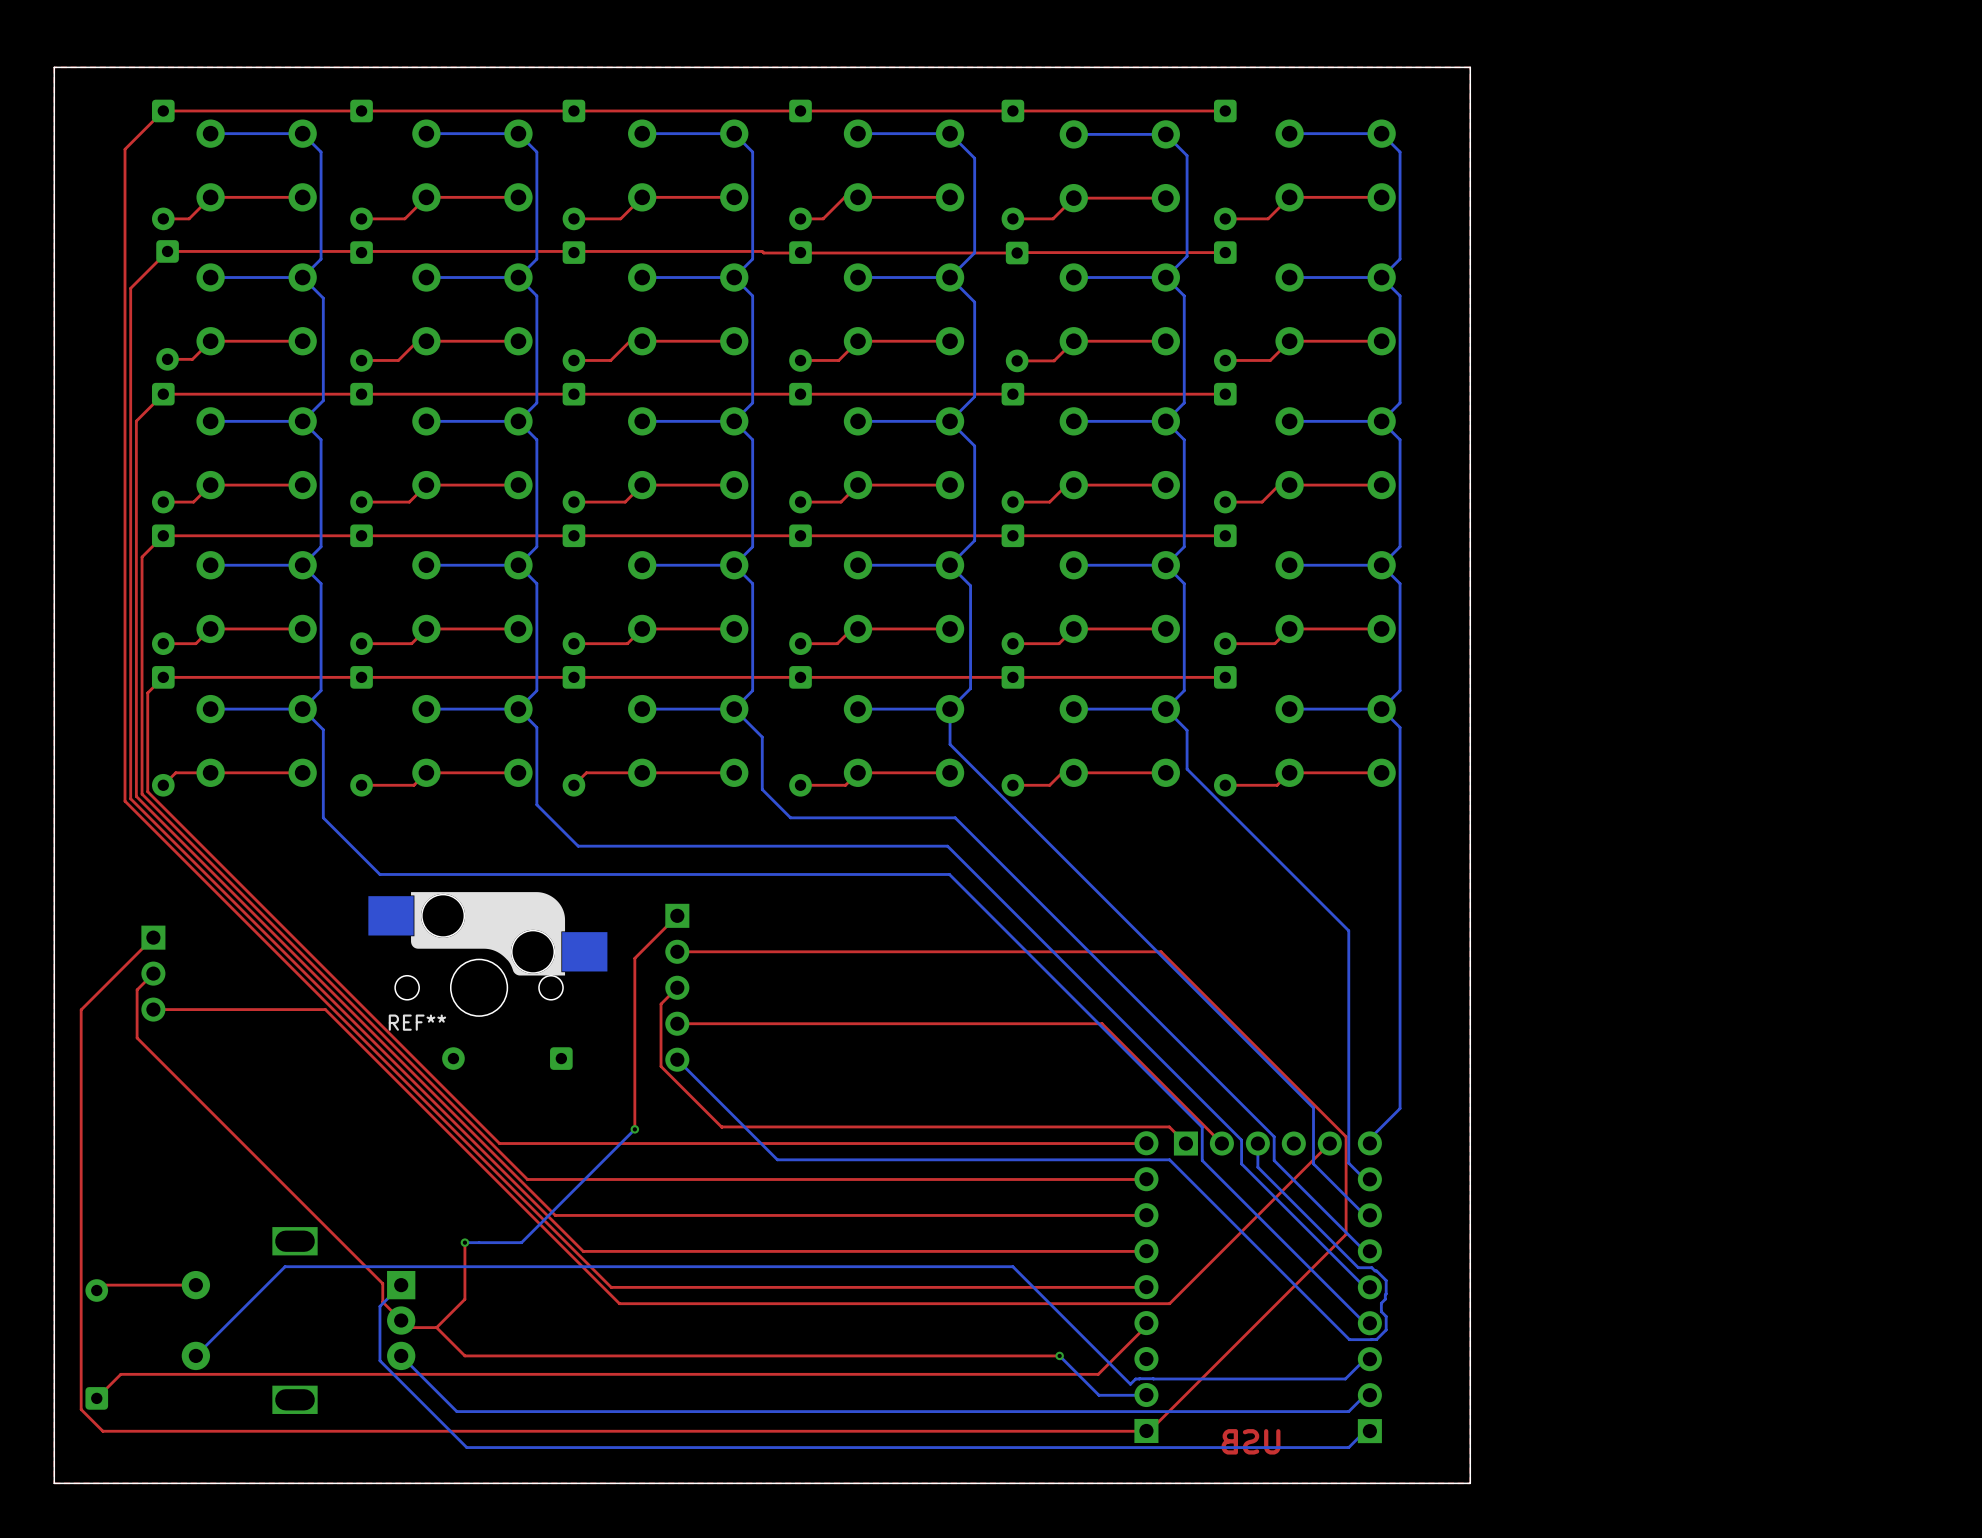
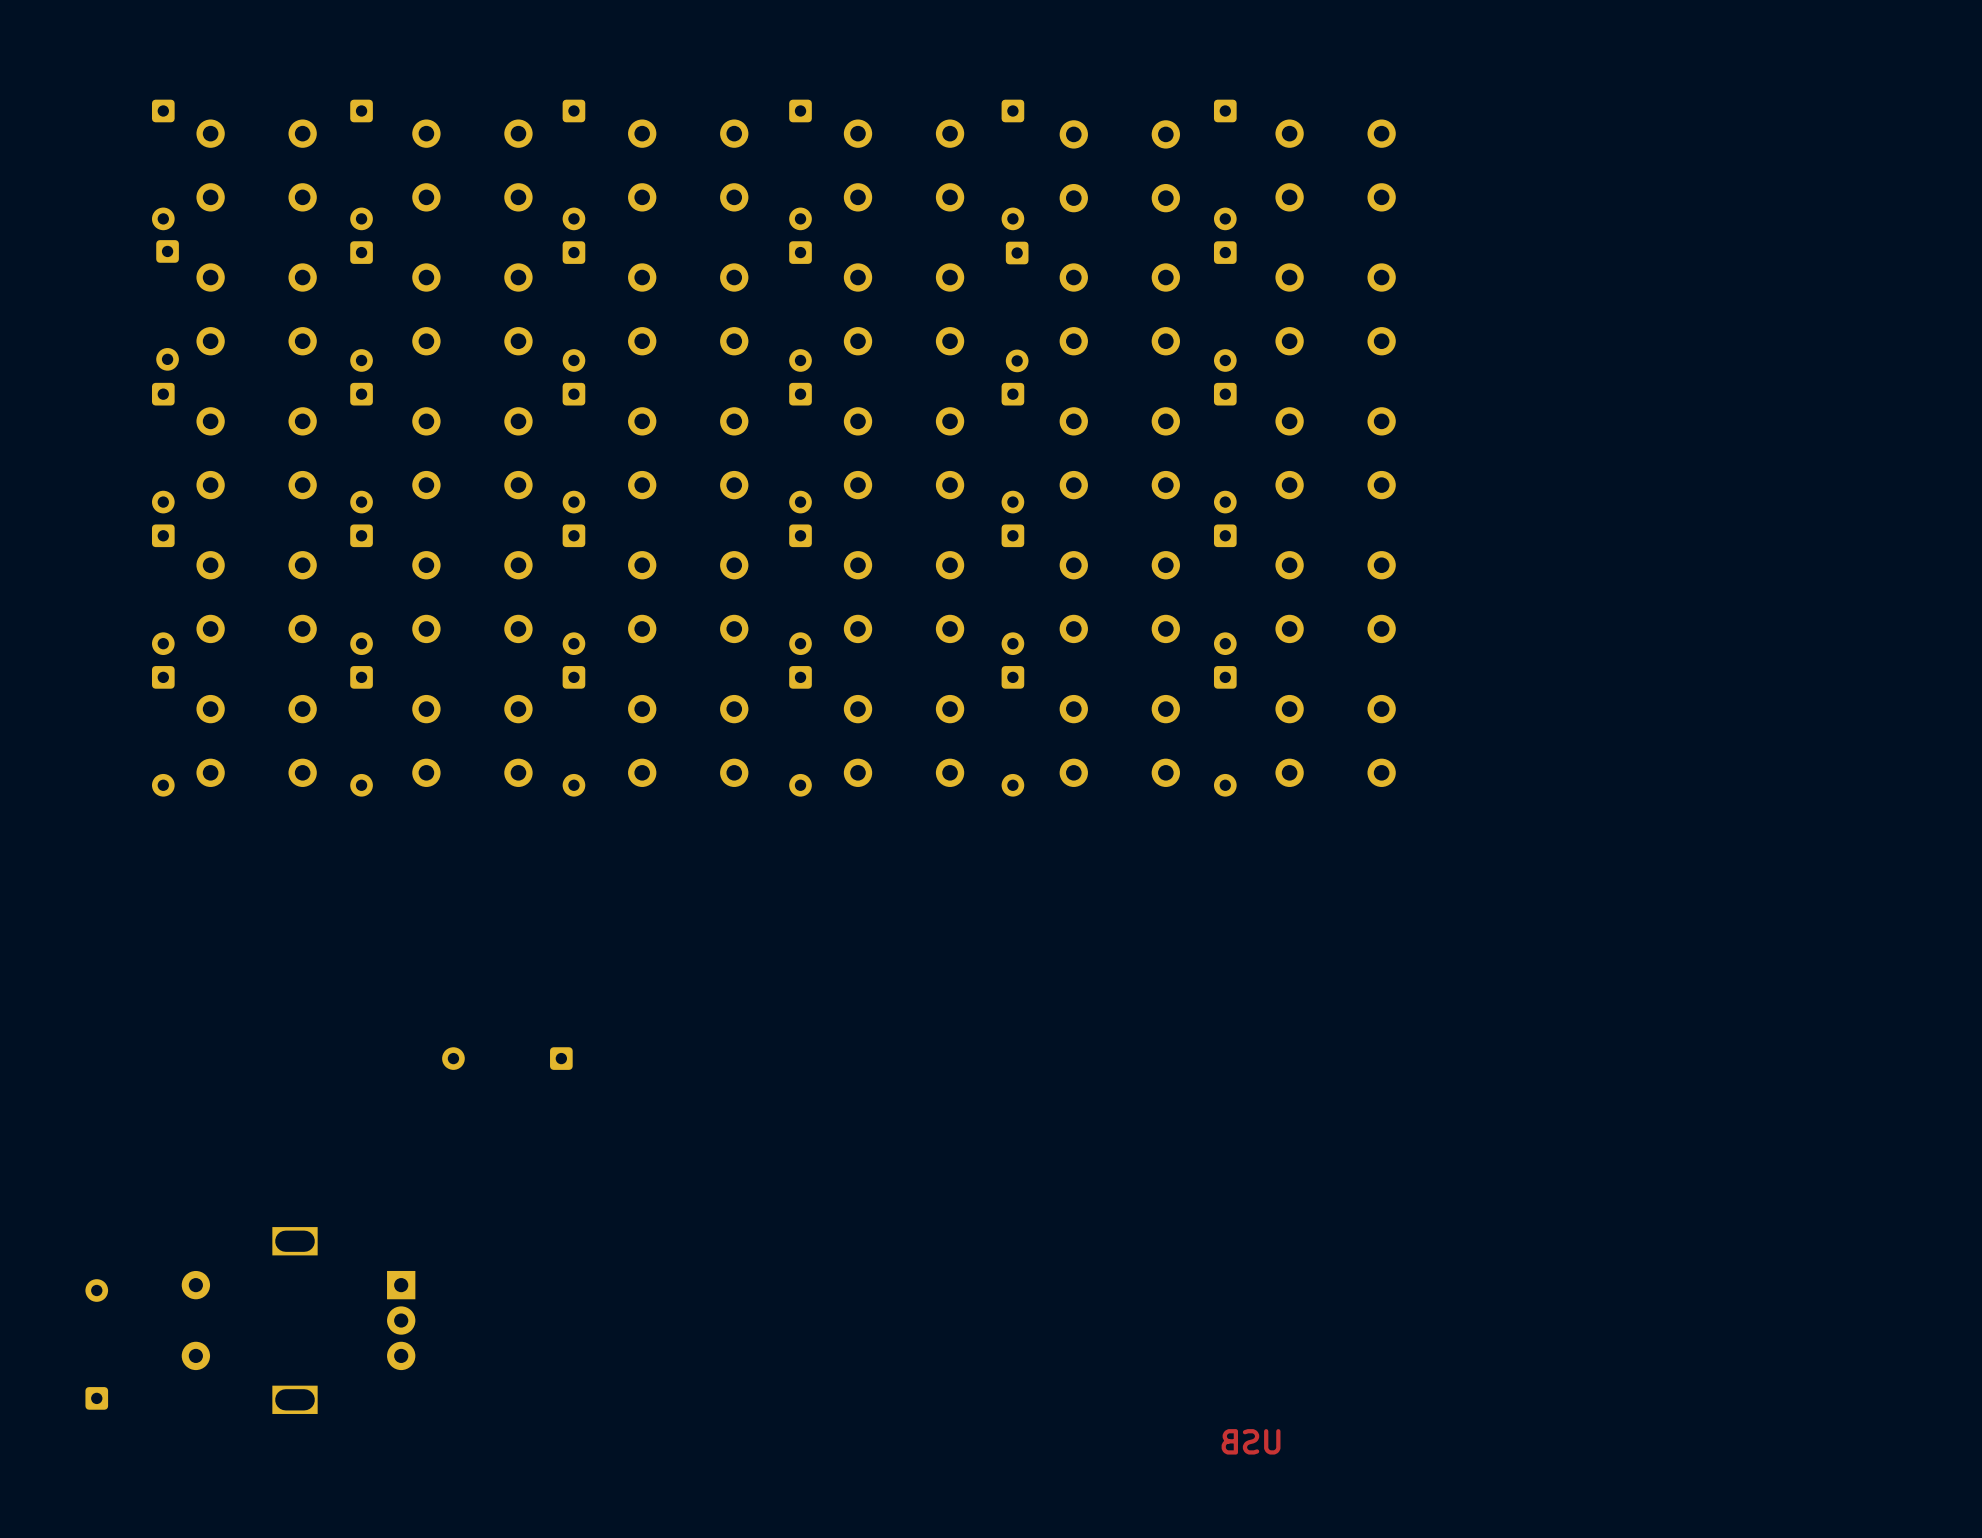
board edge: (1470, 67) (54, 67) (54, 1483) (1470, 1483) (1470, 67) -> none
top track: (1225, 110) (163, 110) (125, 149) (125, 801) (611, 1287) (1149, 1287) -> none
bottom track: (210, 133) (302, 133) (321, 152) (321, 259) (302, 277) -> none
bottom track: (426, 133) (518, 133) (536, 152) (536, 259) (518, 277) -> none
bottom track: (642, 133) (734, 133) (752, 152) (752, 259) (734, 277) -> none
bottom track: (858, 133) (950, 133) (974, 158) (974, 252) (950, 277) -> none
bottom track: (1289, 133) (1381, 133) (1400, 152) (1400, 259) (1381, 277) -> none
bottom track: (1073, 134) (1165, 134) (1187, 155) (1187, 256) (1165, 277) -> none
top track: (302, 197) (210, 197) (189, 218) (163, 218) -> none
top track: (518, 197) (426, 197) (404, 218) (361, 218) -> none
top track: (734, 197) (642, 197) (620, 218) (573, 218) -> none
top track: (950, 197) (844, 197) (823, 218) (800, 218) -> none
top track: (1381, 197) (1289, 197) (1268, 218) (1225, 218) -> none
top track: (1165, 198) (1073, 198) (1053, 218) (1012, 218) -> none
top track: (1225, 252) (167, 251) (130, 288) (130, 798) (583, 1251) (1149, 1251) -> none
bottom track: (302, 277) (210, 277) -> none
bottom track: (302, 277) (323, 298) (323, 400) (302, 421) -> none
bottom track: (518, 277) (426, 277) -> none
bottom track: (518, 277) (536, 295) (536, 402) (518, 421) -> none
bottom track: (734, 277) (642, 277) -> none
bottom track: (734, 277) (752, 295) (752, 402) (734, 421) -> none
bottom track: (950, 277) (974, 302) (974, 396) (950, 421) -> none
bottom track: (950, 277) (858, 277) -> none
bottom track: (1165, 277) (1073, 277) -> none
bottom track: (1165, 277) (1184, 295) (1184, 402) (1165, 421) -> none
bottom track: (1381, 277) (1400, 295) (1400, 402) (1381, 421) -> none
bottom track: (1381, 277) (1289, 277) -> none
top track: (302, 341) (210, 341) (192, 359) (167, 359) -> none
top track: (518, 341) (417, 341) (398, 360) (361, 360) -> none
top track: (734, 341) (630, 341) (610, 360) (573, 360) -> none
top track: (950, 341) (858, 341) (838, 360) (800, 360) -> none
top track: (1165, 341) (1073, 341) (1054, 360) (1017, 360) -> none
top track: (1381, 341) (1289, 341) (1270, 360) (1225, 360) -> none
top track: (1225, 394) (163, 394) (136, 421) (136, 796) (555, 1215) (1149, 1215) -> none
bottom track: (302, 421) (210, 421) -> none
bottom track: (302, 421) (321, 439) (321, 546) (302, 565) -> none
bottom track: (518, 421) (426, 421) -> none
bottom track: (518, 421) (536, 439) (536, 546) (518, 565) -> none
bottom track: (734, 421) (642, 421) -> none
bottom track: (734, 421) (752, 439) (752, 546) (734, 565) -> none
bottom track: (950, 421) (858, 421) -> none
bottom track: (950, 421) (974, 446) (974, 540) (950, 565) -> none
bottom track: (1165, 421) (1073, 421) -> none
bottom track: (1165, 421) (1184, 439) (1184, 546) (1165, 565) -> none
bottom track: (1381, 421) (1289, 421) -> none
bottom track: (1381, 421) (1400, 439) (1400, 546) (1381, 565) -> none
top track: (302, 485) (210, 485) (193, 502) (163, 502) -> none
top track: (518, 485) (426, 485) (409, 502) (361, 502) -> none
top track: (734, 485) (642, 485) (625, 502) (573, 502) -> none
top track: (950, 485) (858, 485) (841, 502) (800, 502) -> none
top track: (1165, 485) (1066, 485) (1049, 502) (1012, 502) -> none
top track: (1381, 485) (1279, 485) (1262, 502) (1225, 502) -> none
top track: (1225, 535) (163, 535) (142, 557) (142, 794) (527, 1179) (1149, 1179) -> none
bottom track: (302, 565) (210, 565) -> none
bottom track: (302, 565) (321, 583) (321, 690) (302, 709) -> none
bottom track: (518, 565) (426, 565) -> none
bottom track: (518, 565) (536, 583) (536, 690) (518, 709) -> none
bottom track: (734, 565) (642, 565) -> none
bottom track: (734, 565) (752, 583) (752, 690) (734, 709) -> none
bottom track: (950, 565) (858, 565) -> none
bottom track: (950, 565) (970, 585) (970, 688) (950, 709) -> none
bottom track: (1165, 565) (1073, 565) -> none
bottom track: (1165, 565) (1184, 583) (1184, 690) (1165, 709) -> none
bottom track: (1381, 565) (1400, 583) (1400, 690) (1381, 709) -> none
bottom track: (1381, 565) (1289, 565) -> none
top track: (302, 628) (210, 628) (195, 643) (163, 643) -> none
top track: (518, 628) (426, 628) (411, 643) (361, 643) -> none
top track: (734, 628) (642, 628) (627, 643) (573, 643) -> none
top track: (950, 628) (852, 628) (837, 643) (800, 643) -> none
top track: (1165, 628) (1073, 628) (1059, 643) (1012, 643) -> none
top track: (1381, 628) (1289, 628) (1274, 643) (1225, 643) -> none
top track: (1225, 677) (163, 677) (147, 692) (147, 791) (499, 1143) (1149, 1143) -> none
bottom track: (302, 709) (210, 709) -> none
bottom track: (302, 709) (323, 729) (323, 817) (379, 874) (949, 874) (1202, 1127) (1202, 1160) (1365, 1323) -> none
bottom track: (518, 709) (426, 709) -> none
bottom track: (518, 709) (536, 727) (536, 804) (578, 846) (947, 846) (1241, 1140) (1241, 1163) (1365, 1287) -> none
bottom track: (734, 709) (642, 709) -> none
bottom track: (734, 709) (762, 737) (762, 789) (790, 817) (955, 817) (1274, 1136) (1274, 1160) (1365, 1251) -> none
bottom track: (950, 709) (858, 709) -> none
bottom track: (950, 709) (950, 744) (1313, 1107) (1313, 1163) (1365, 1215) -> none
bottom track: (1165, 709) (1073, 709) -> none
bottom track: (1165, 709) (1187, 730) (1187, 769) (1348, 930) (1348, 1163) (1365, 1179) -> none
bottom track: (1381, 709) (1400, 727) (1400, 1108) (1365, 1143) -> none
bottom track: (1381, 709) (1289, 709) -> none
top track: (302, 772) (175, 772) (163, 785) -> none
top track: (518, 772) (426, 772) (413, 785) (361, 785) -> none
top track: (734, 772) (586, 772) (573, 785) -> none
top track: (950, 772) (858, 772) (845, 785) (800, 785) -> none
top track: (1165, 772) (1062, 772) (1049, 785) (1012, 785) -> none
top track: (1381, 772) (1289, 772) (1277, 785) (1225, 785) -> none
top track: (677, 915) (634, 958) (634, 1129) -> none
top track: (153, 937) (81, 1009) (81, 1409) (102, 1431) (1149, 1431) (1346, 1234) (1346, 1136) (1161, 951) (677, 951) -> none
REF**: (487, 954) -> none
top track: (153, 973) (137, 989) (137, 1037) (382, 1283) (382, 1302) (408, 1327) (436, 1327) -> none
part: (153, 973) -> none
top track: (677, 987) (661, 1004) (661, 1066) (721, 1127) (1169, 1126) (1185, 1143) -> none
part: (677, 987) -> none
top track: (153, 1009) (325, 1009) (619, 1303) (1169, 1303) (1329, 1143) -> none
top track: (677, 1023) (1102, 1023) (1221, 1143) -> none
bottom track: (677, 1059) (777, 1159) (1169, 1159) (1349, 1339) (1371, 1339) -> none
bottom track: (634, 1129) (521, 1242) (464, 1242) -> none
via: (634, 1129) -> none
bottom track: (1257, 1143) (1257, 1167) (1358, 1267) (1371, 1267) (1386, 1280) (1385, 1299) (1381, 1303) (1381, 1311) (1386, 1316) (1386, 1329) (1376, 1339) (1371, 1339) -> none
top track: (464, 1242) (464, 1299) (436, 1327) -> none
via: (464, 1242) -> none
top track: (195, 1285) (102, 1285) (96, 1290) -> none
bottom track: (401, 1285) (379, 1306) (379, 1360) (466, 1447) (1348, 1447) (1365, 1431) -> none
part: (1258, 1287) -> none
top track: (1149, 1323) (1098, 1374) (120, 1374) (96, 1398) -> none
top track: (436, 1327) (464, 1355) (1059, 1355) -> none
bottom track: (195, 1355) (285, 1266) (1012, 1266) (1130, 1384) (1135, 1378) (1139, 1378) (1345, 1378) (1365, 1359) -> none
bottom track: (401, 1355) (456, 1411) (1348, 1411) (1365, 1395) -> none
bottom track: (1059, 1355) (1099, 1395) (1149, 1395) -> none
via: (1059, 1355) -> none

